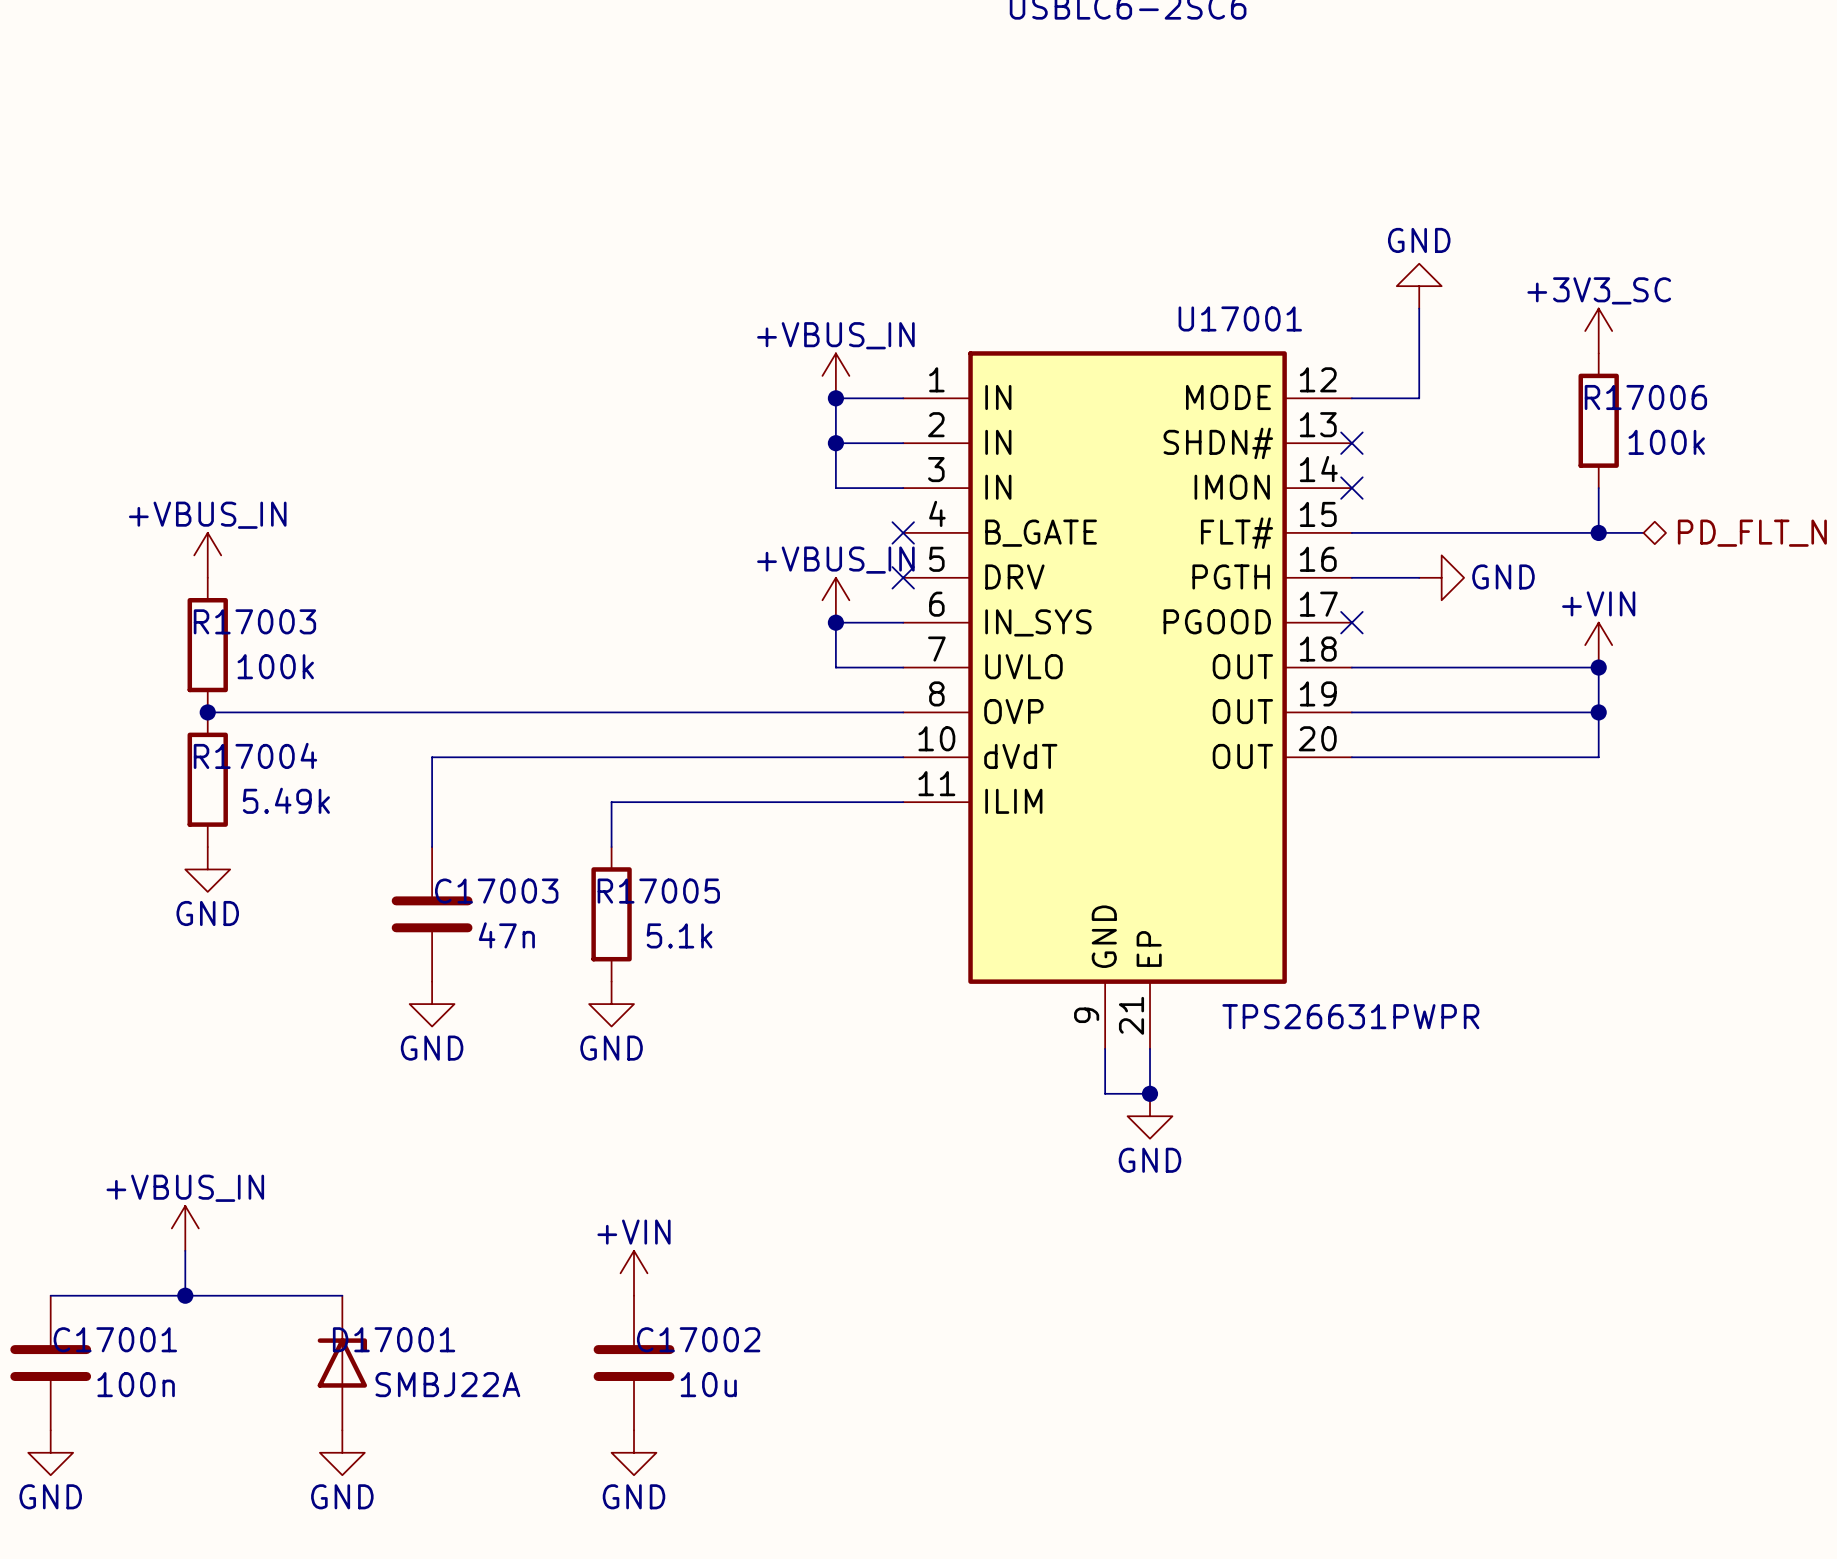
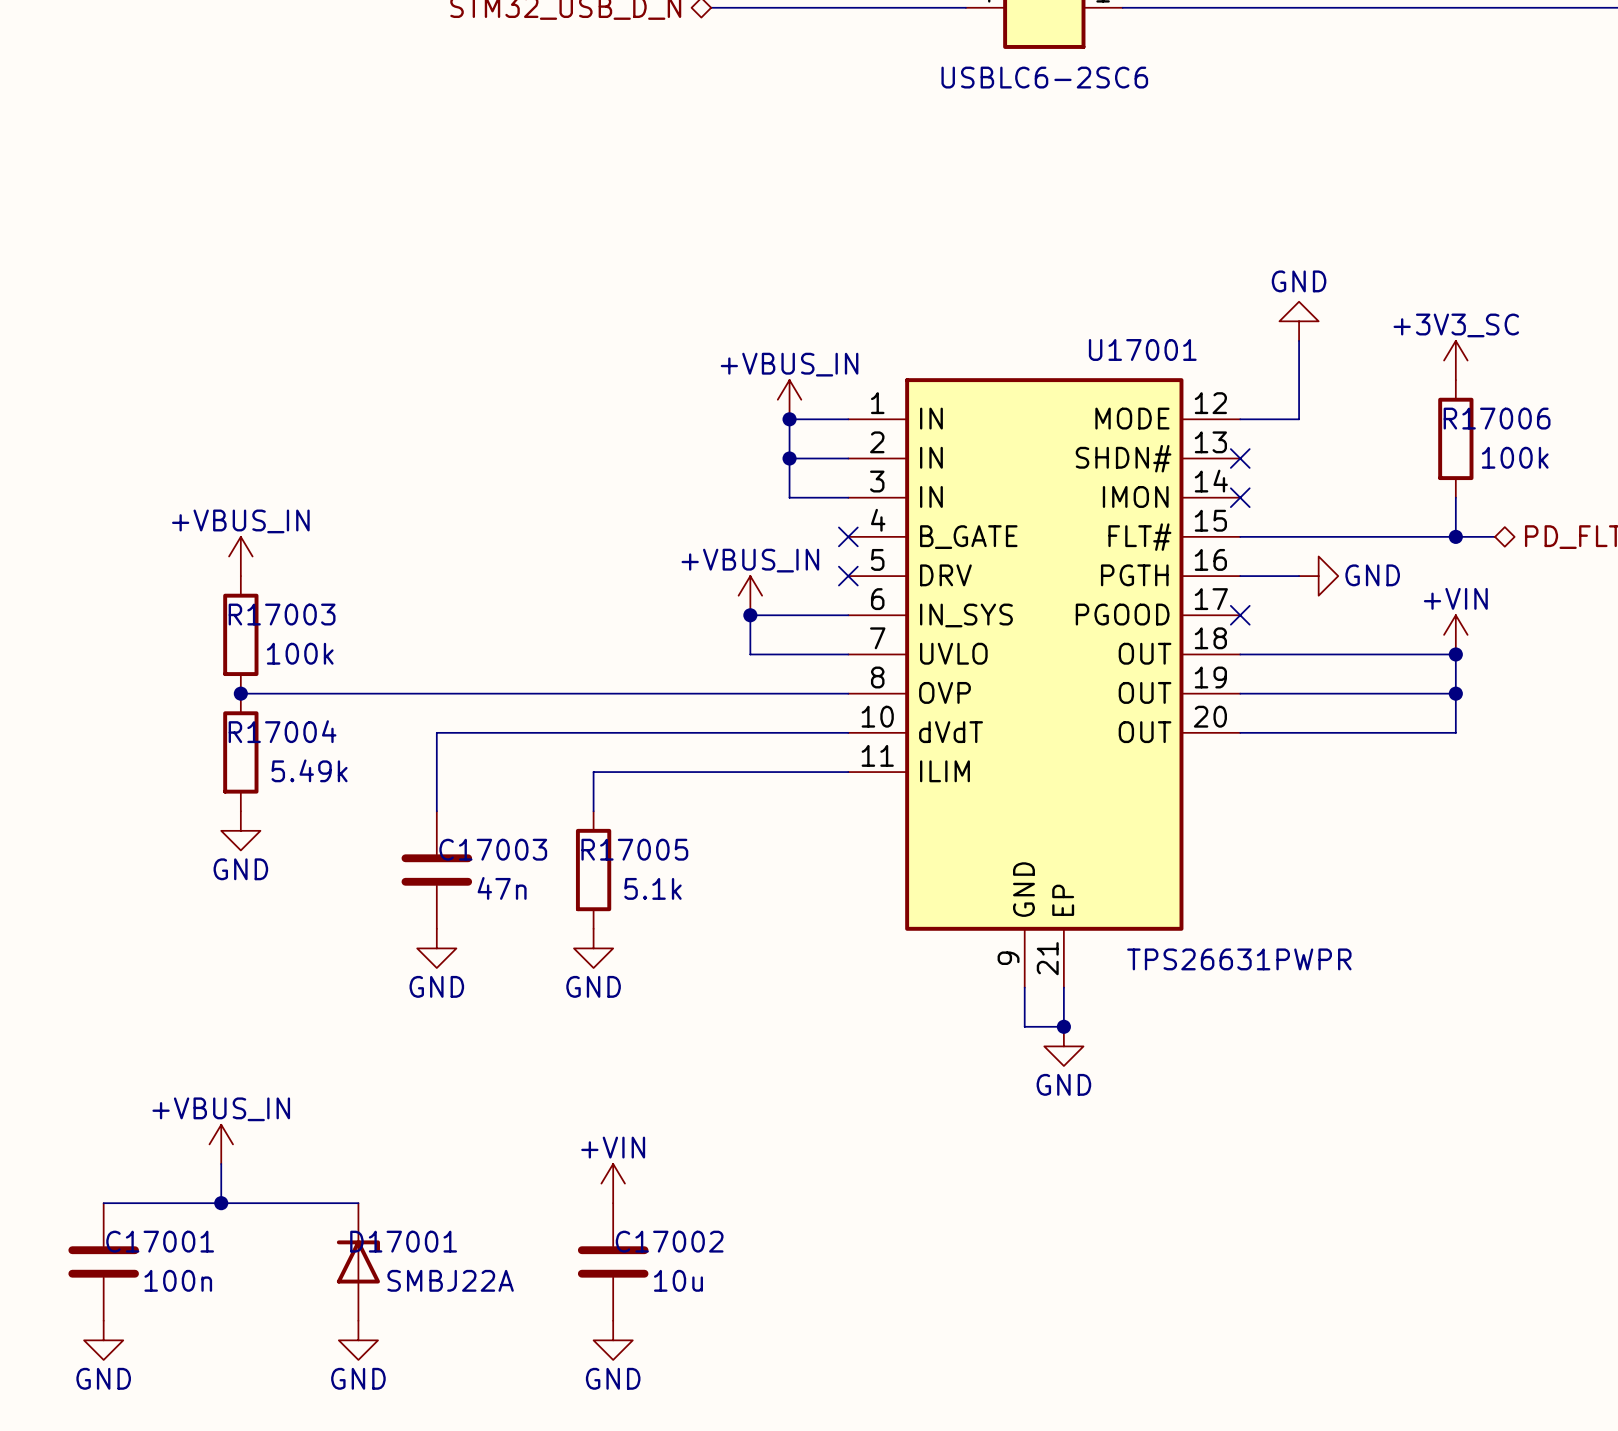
power symbol position: +VBUS_IN (835, 600) -> +VBUS_IN (750, 595)
wire: (835, 622) (835, 667) -> (789, 615) (750, 615) (750, 654) (789, 654)
junction position: (835, 622) -> (750, 615)

